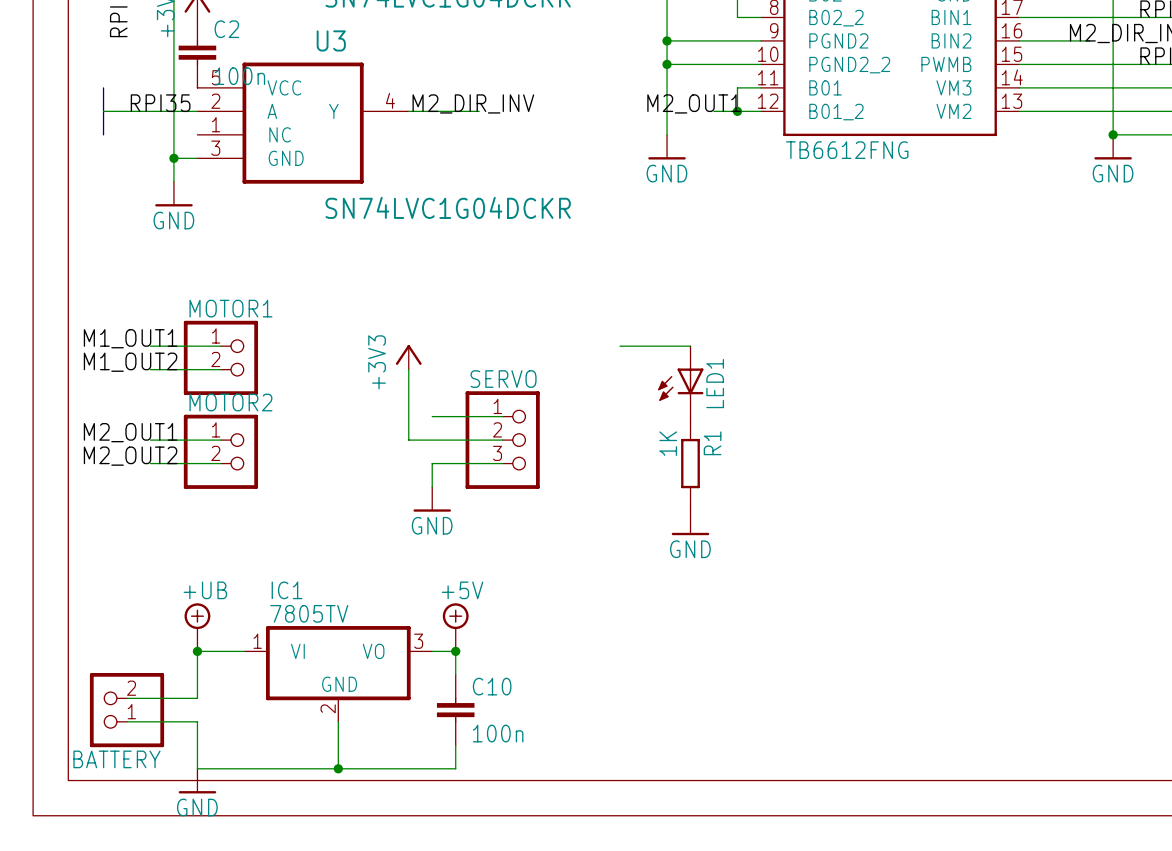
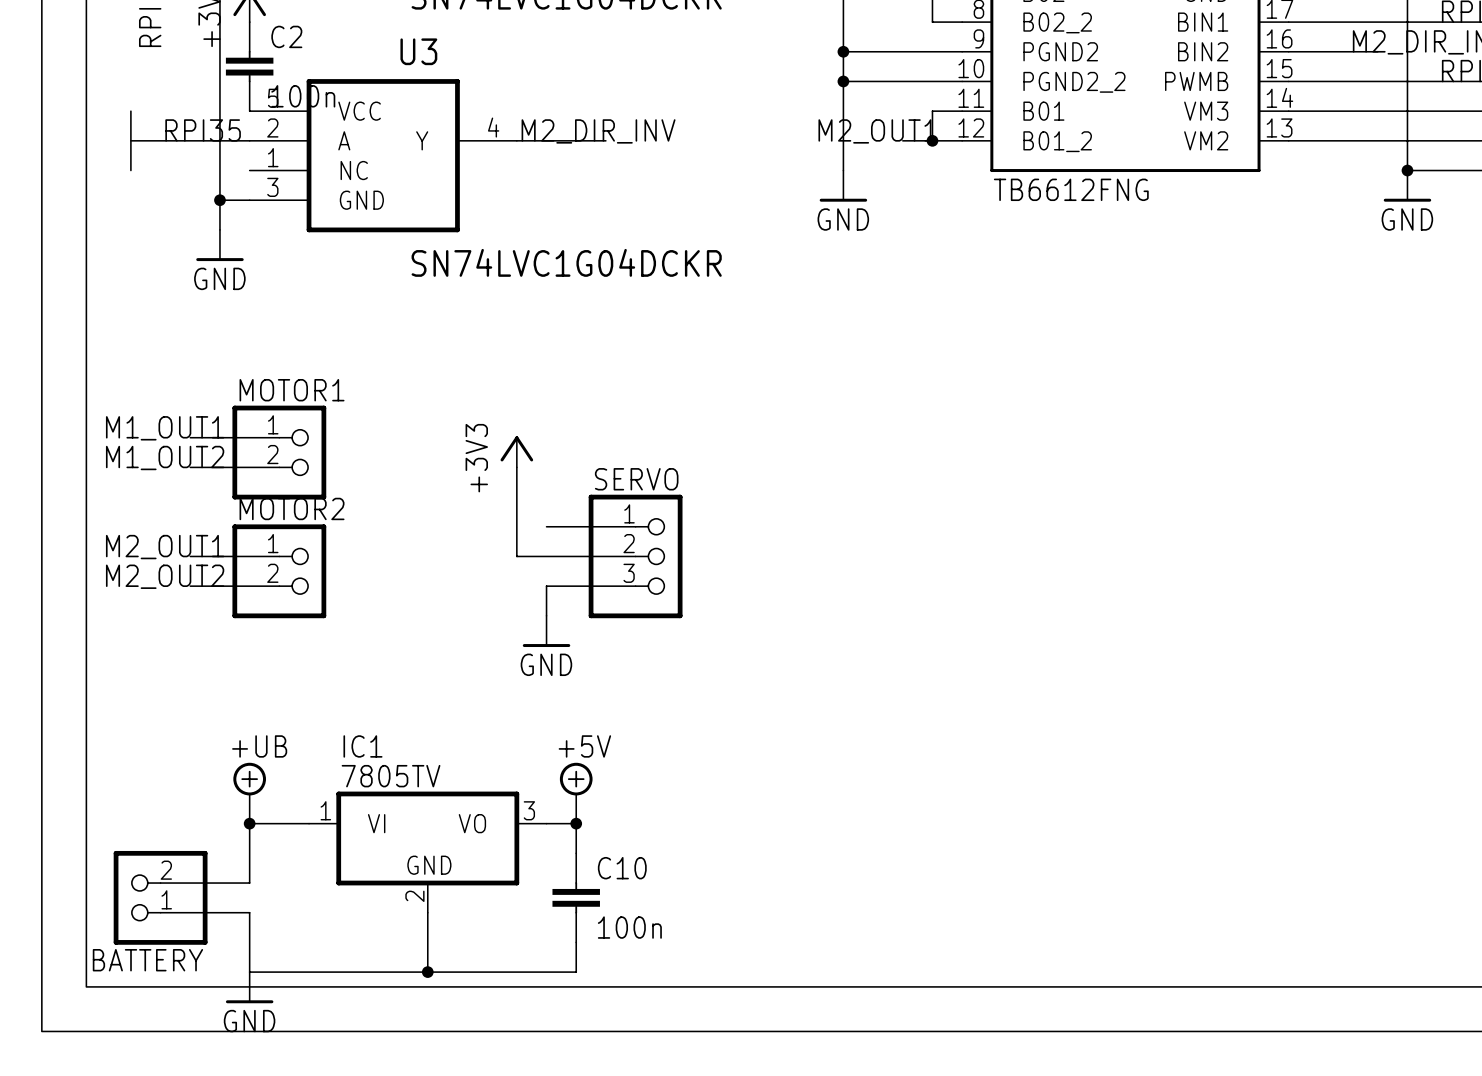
wire: (620, 346) (690, 346) -> none
LED1: (680, 381) -> none
R1: 1K (690, 463) -> none
power symbol: GND (690, 522) -> none

